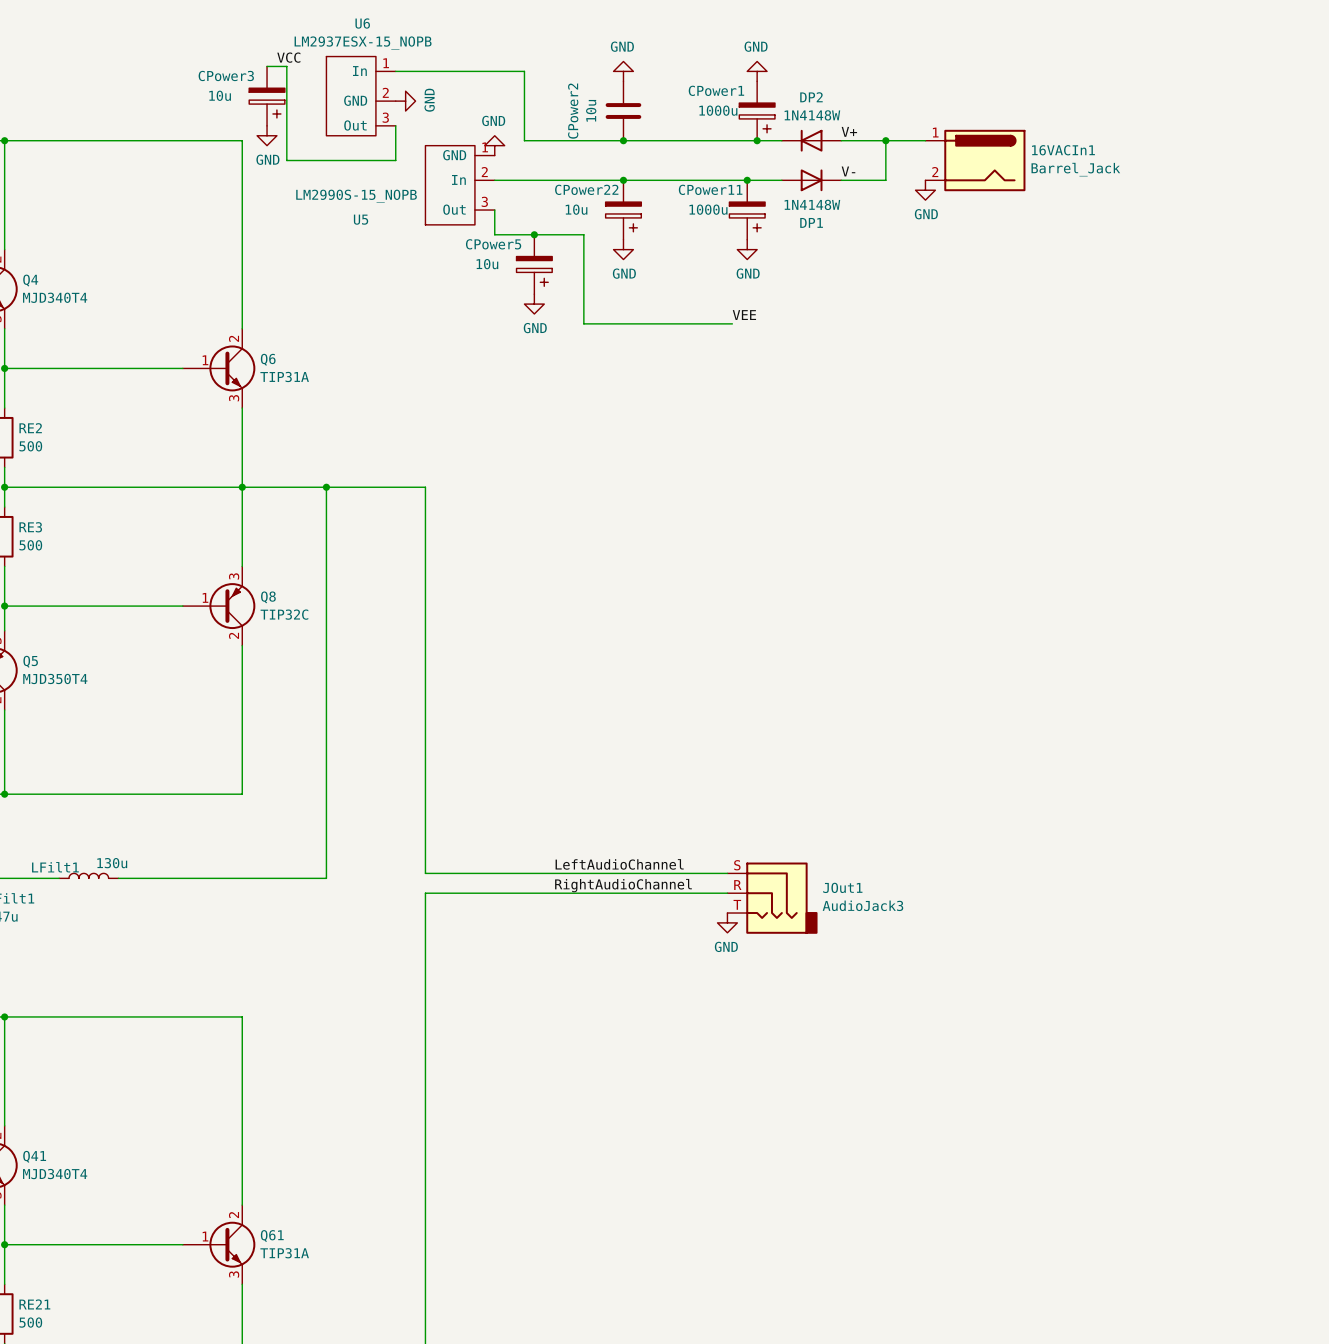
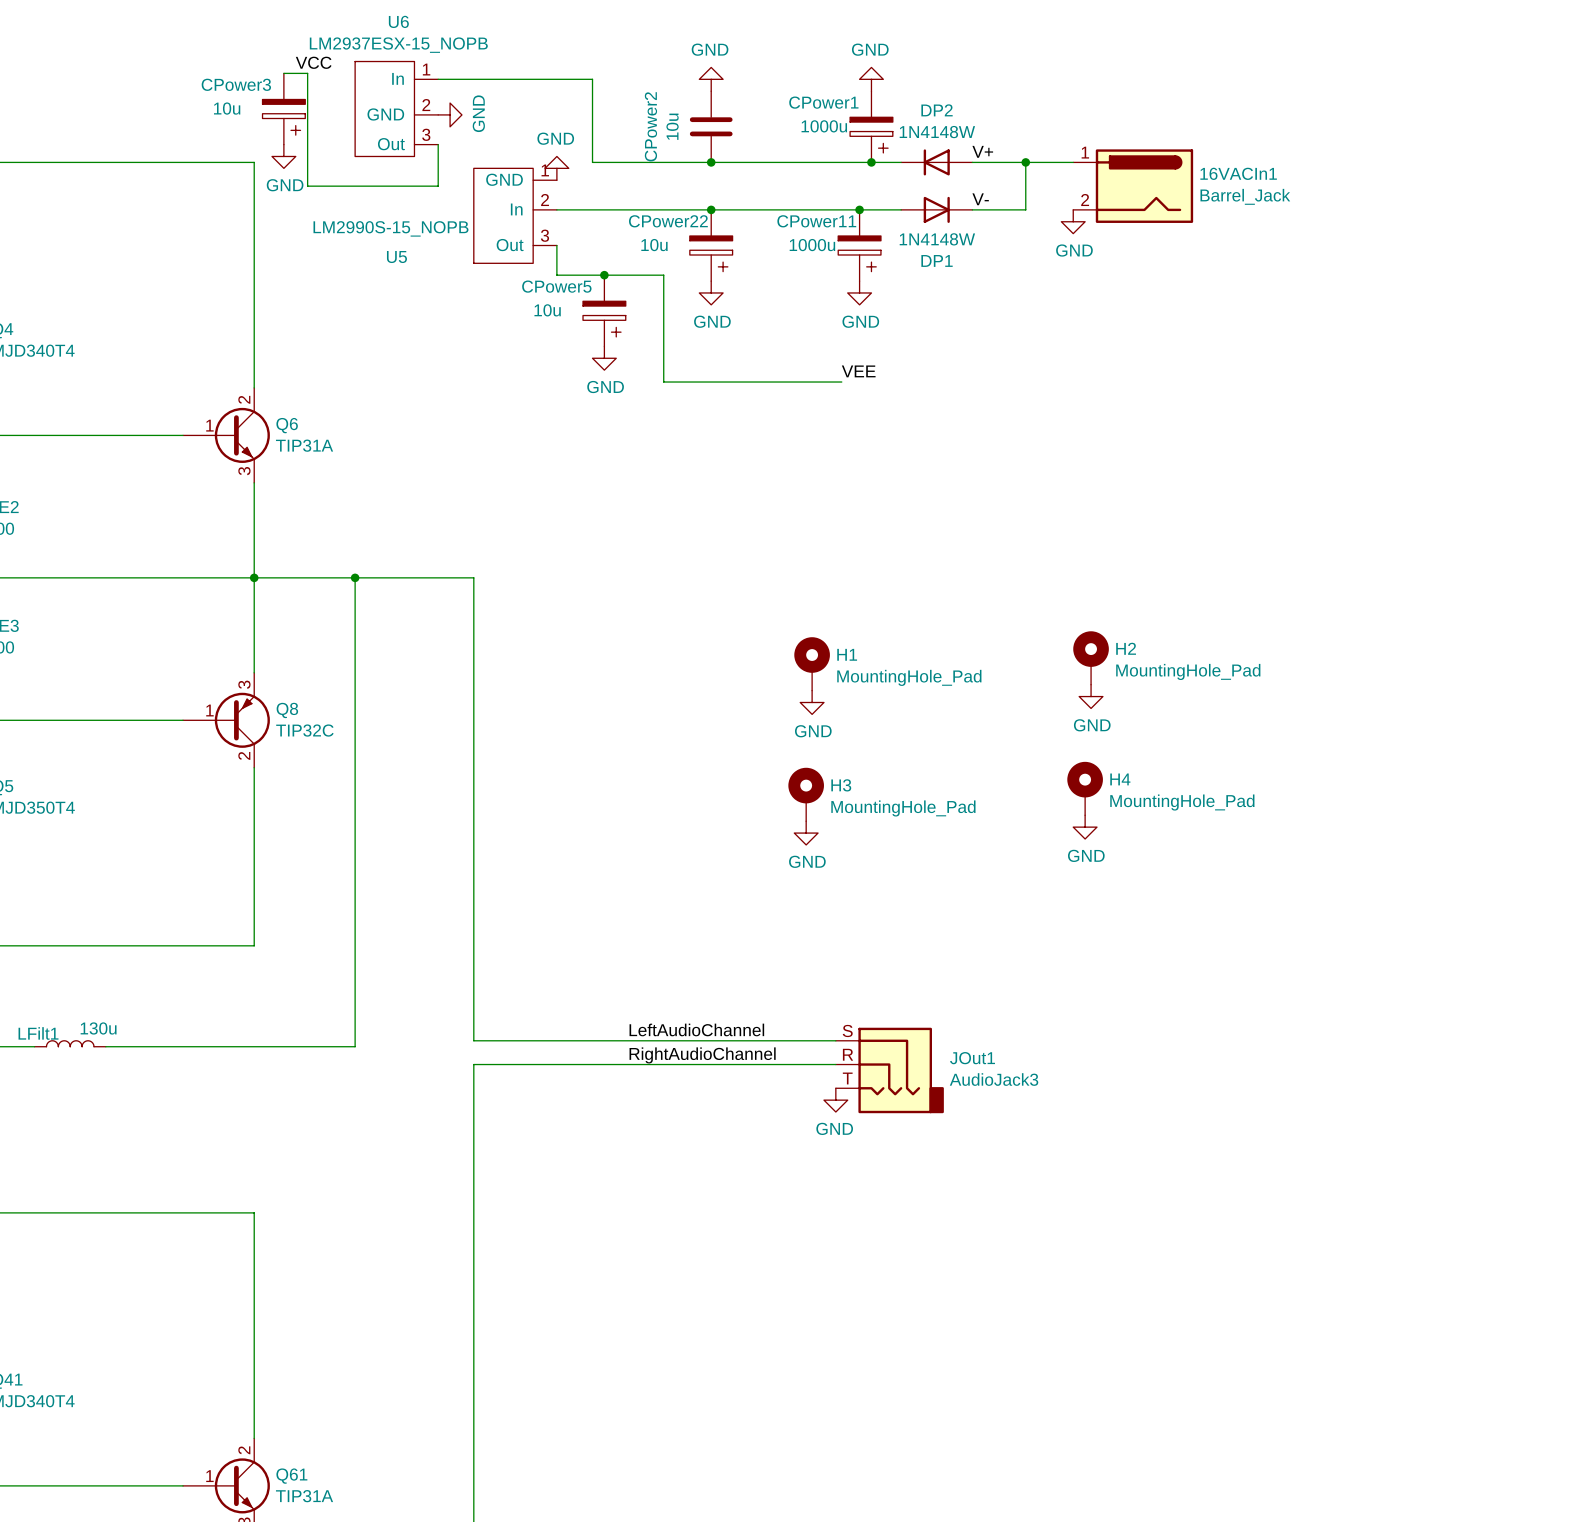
H2: none -> MountingHole_Pad (1091, 657)
H1: none -> MountingHole_Pad (812, 663)
power symbol: none -> GND (1091, 696)
power symbol: none -> GND (812, 702)
H4: none -> MountingHole_Pad (1085, 788)
H3: none -> MountingHole_Pad (806, 794)
power symbol: none -> GND (1085, 827)
power symbol: none -> GND (806, 833)

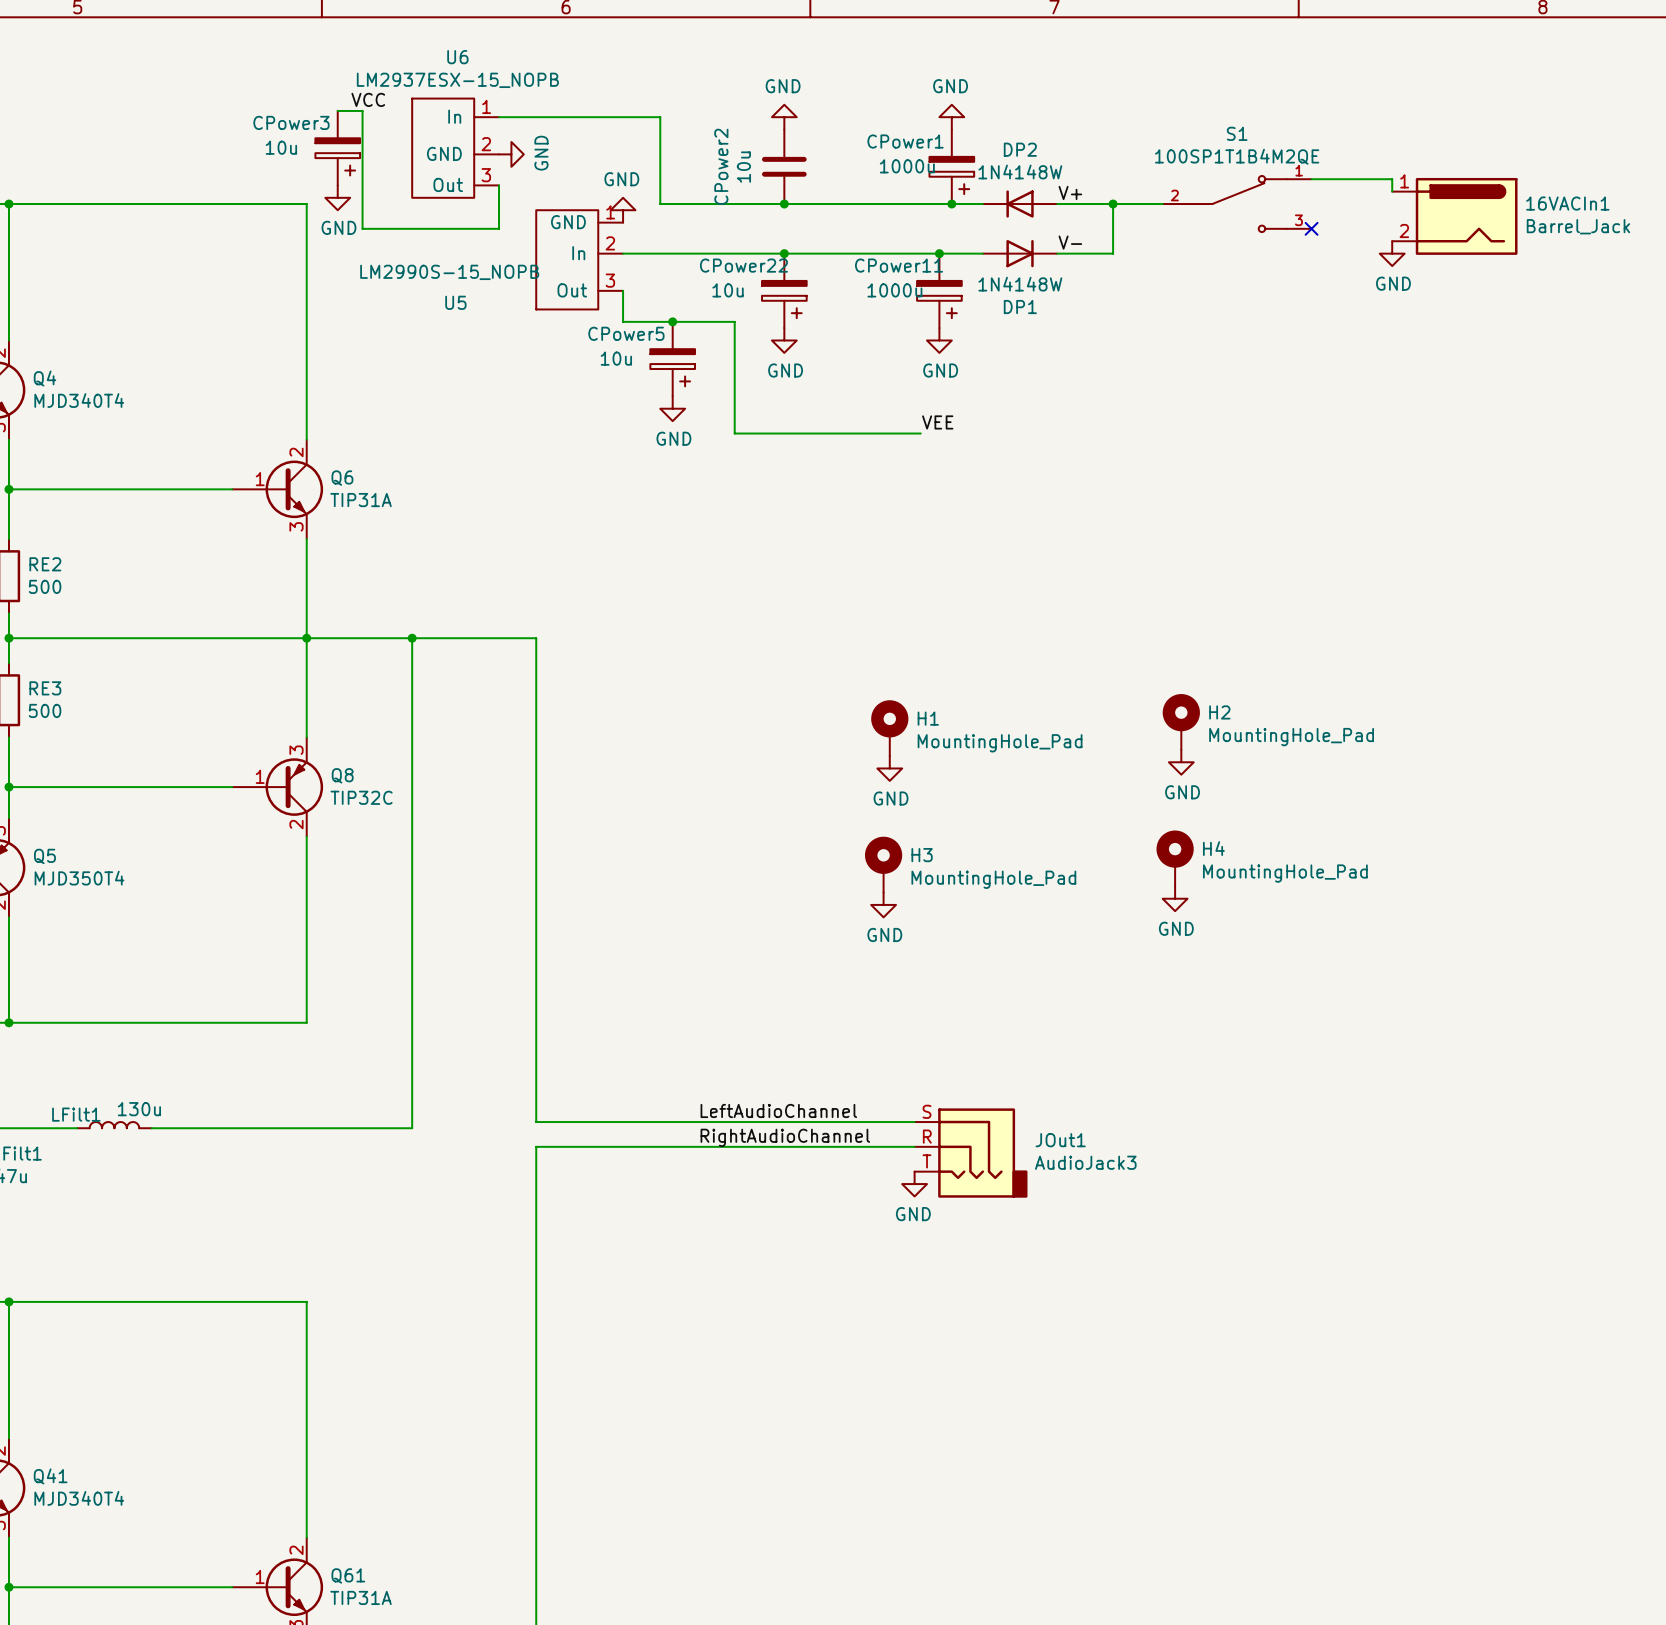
wire: none -> (1311, 179) (1392, 179) (1392, 191)
S1: none -> 100SP1T1B4M2QE (1237, 204)
16VACIn1 position: (1133, 186) -> (1454, 216)
no-connect mark: none -> (1311, 228)
power symbol position: GND (1073, 221) -> GND (1392, 253)

